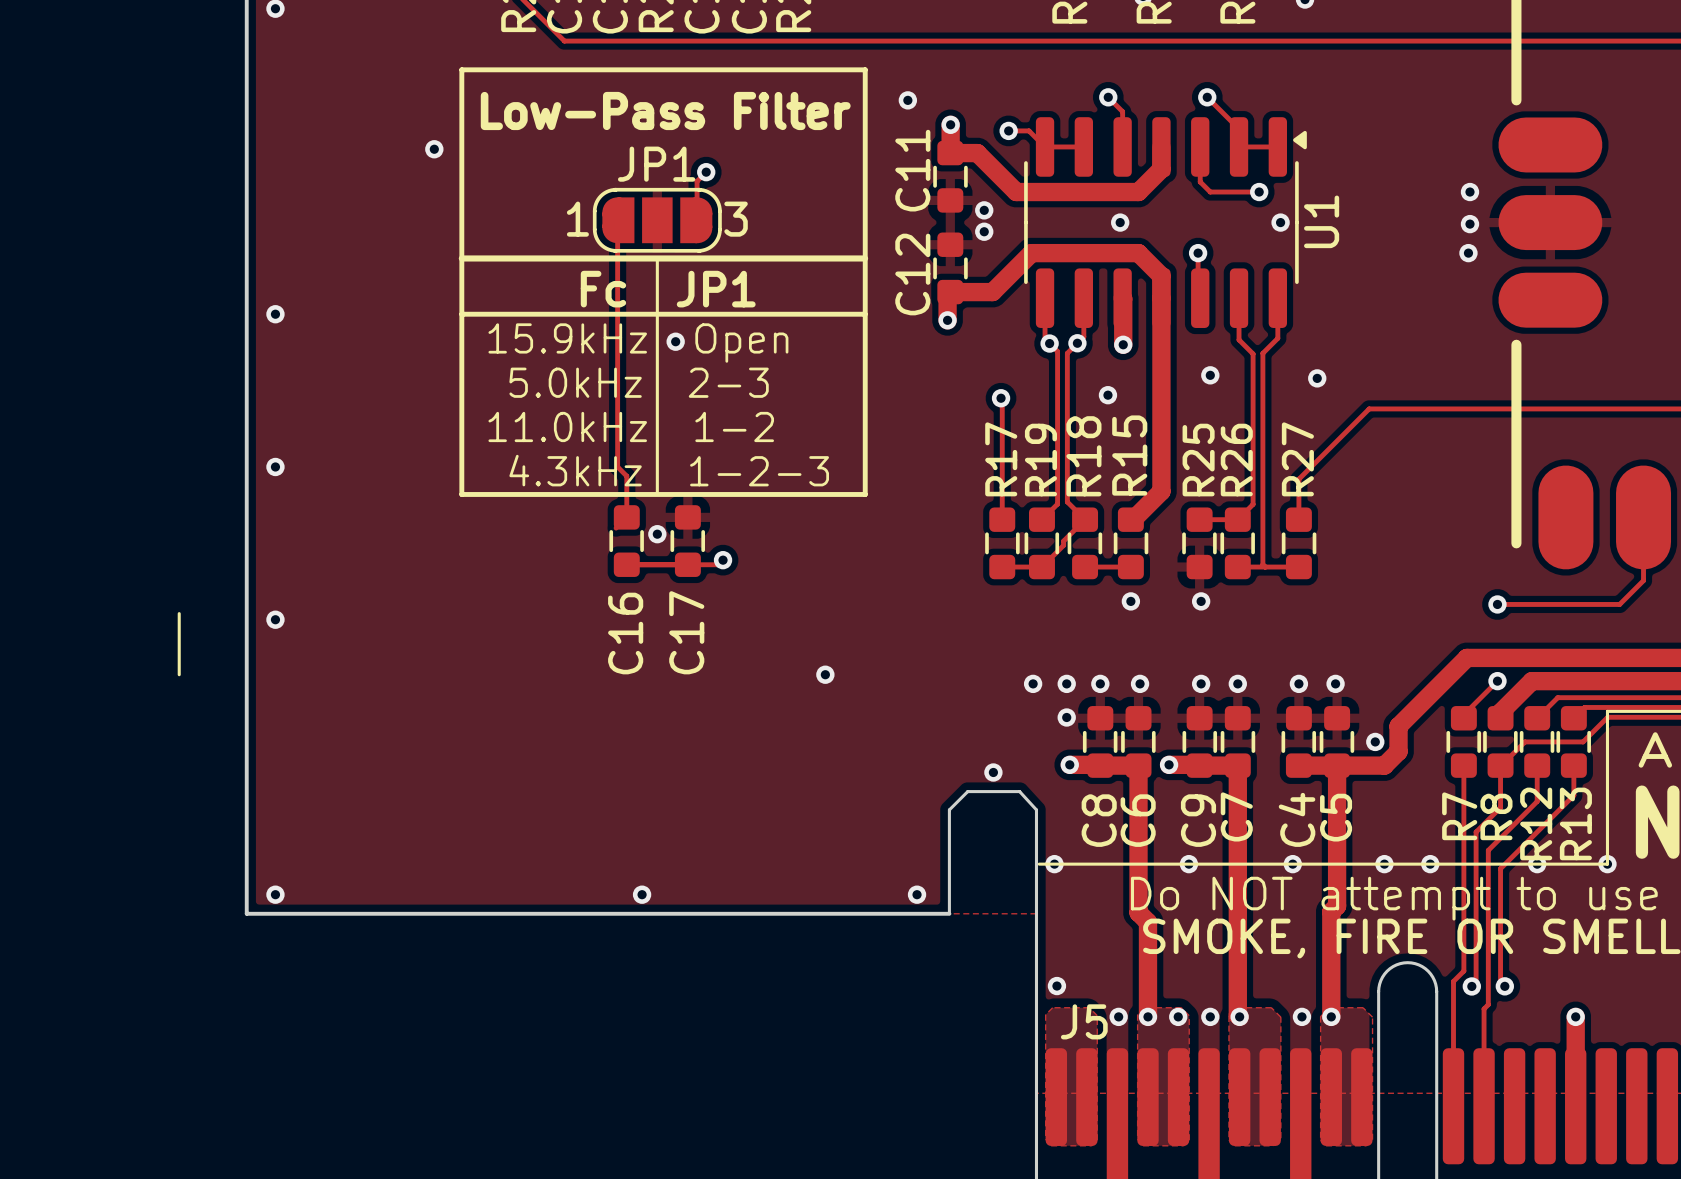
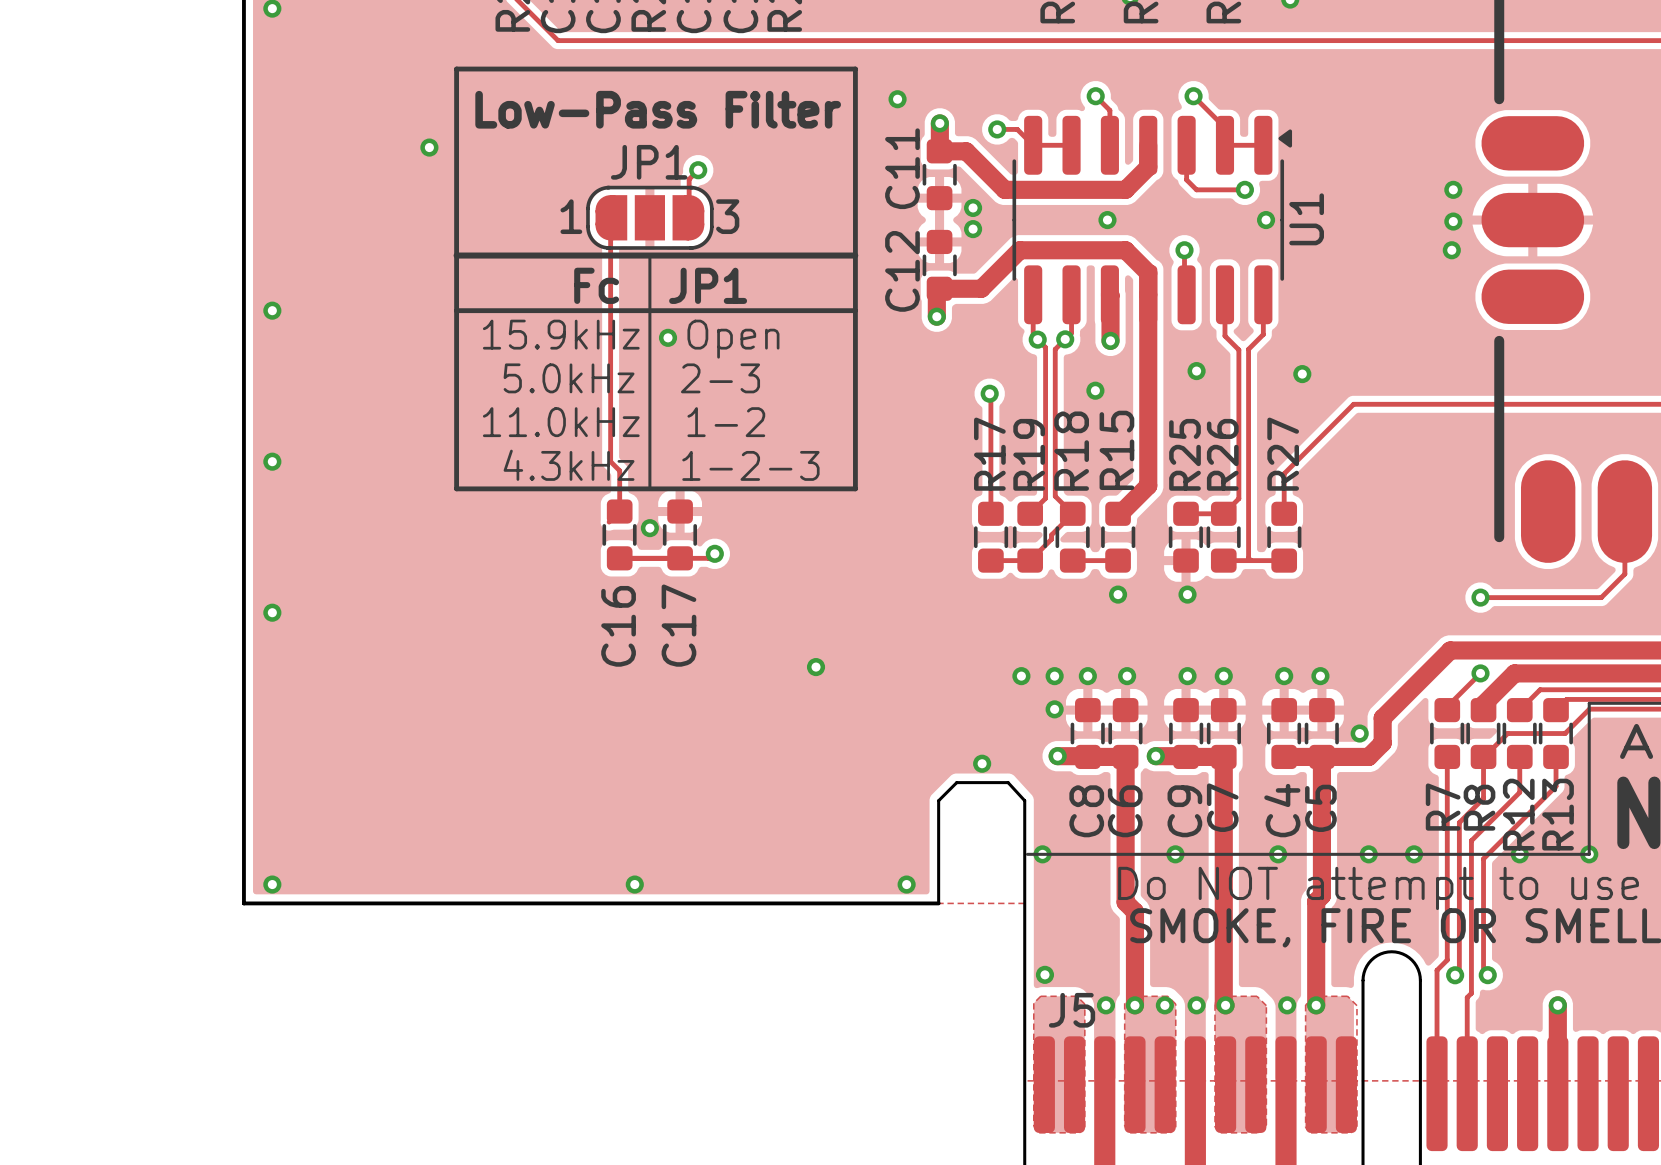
line: (179, 613) (179, 674) -> none

